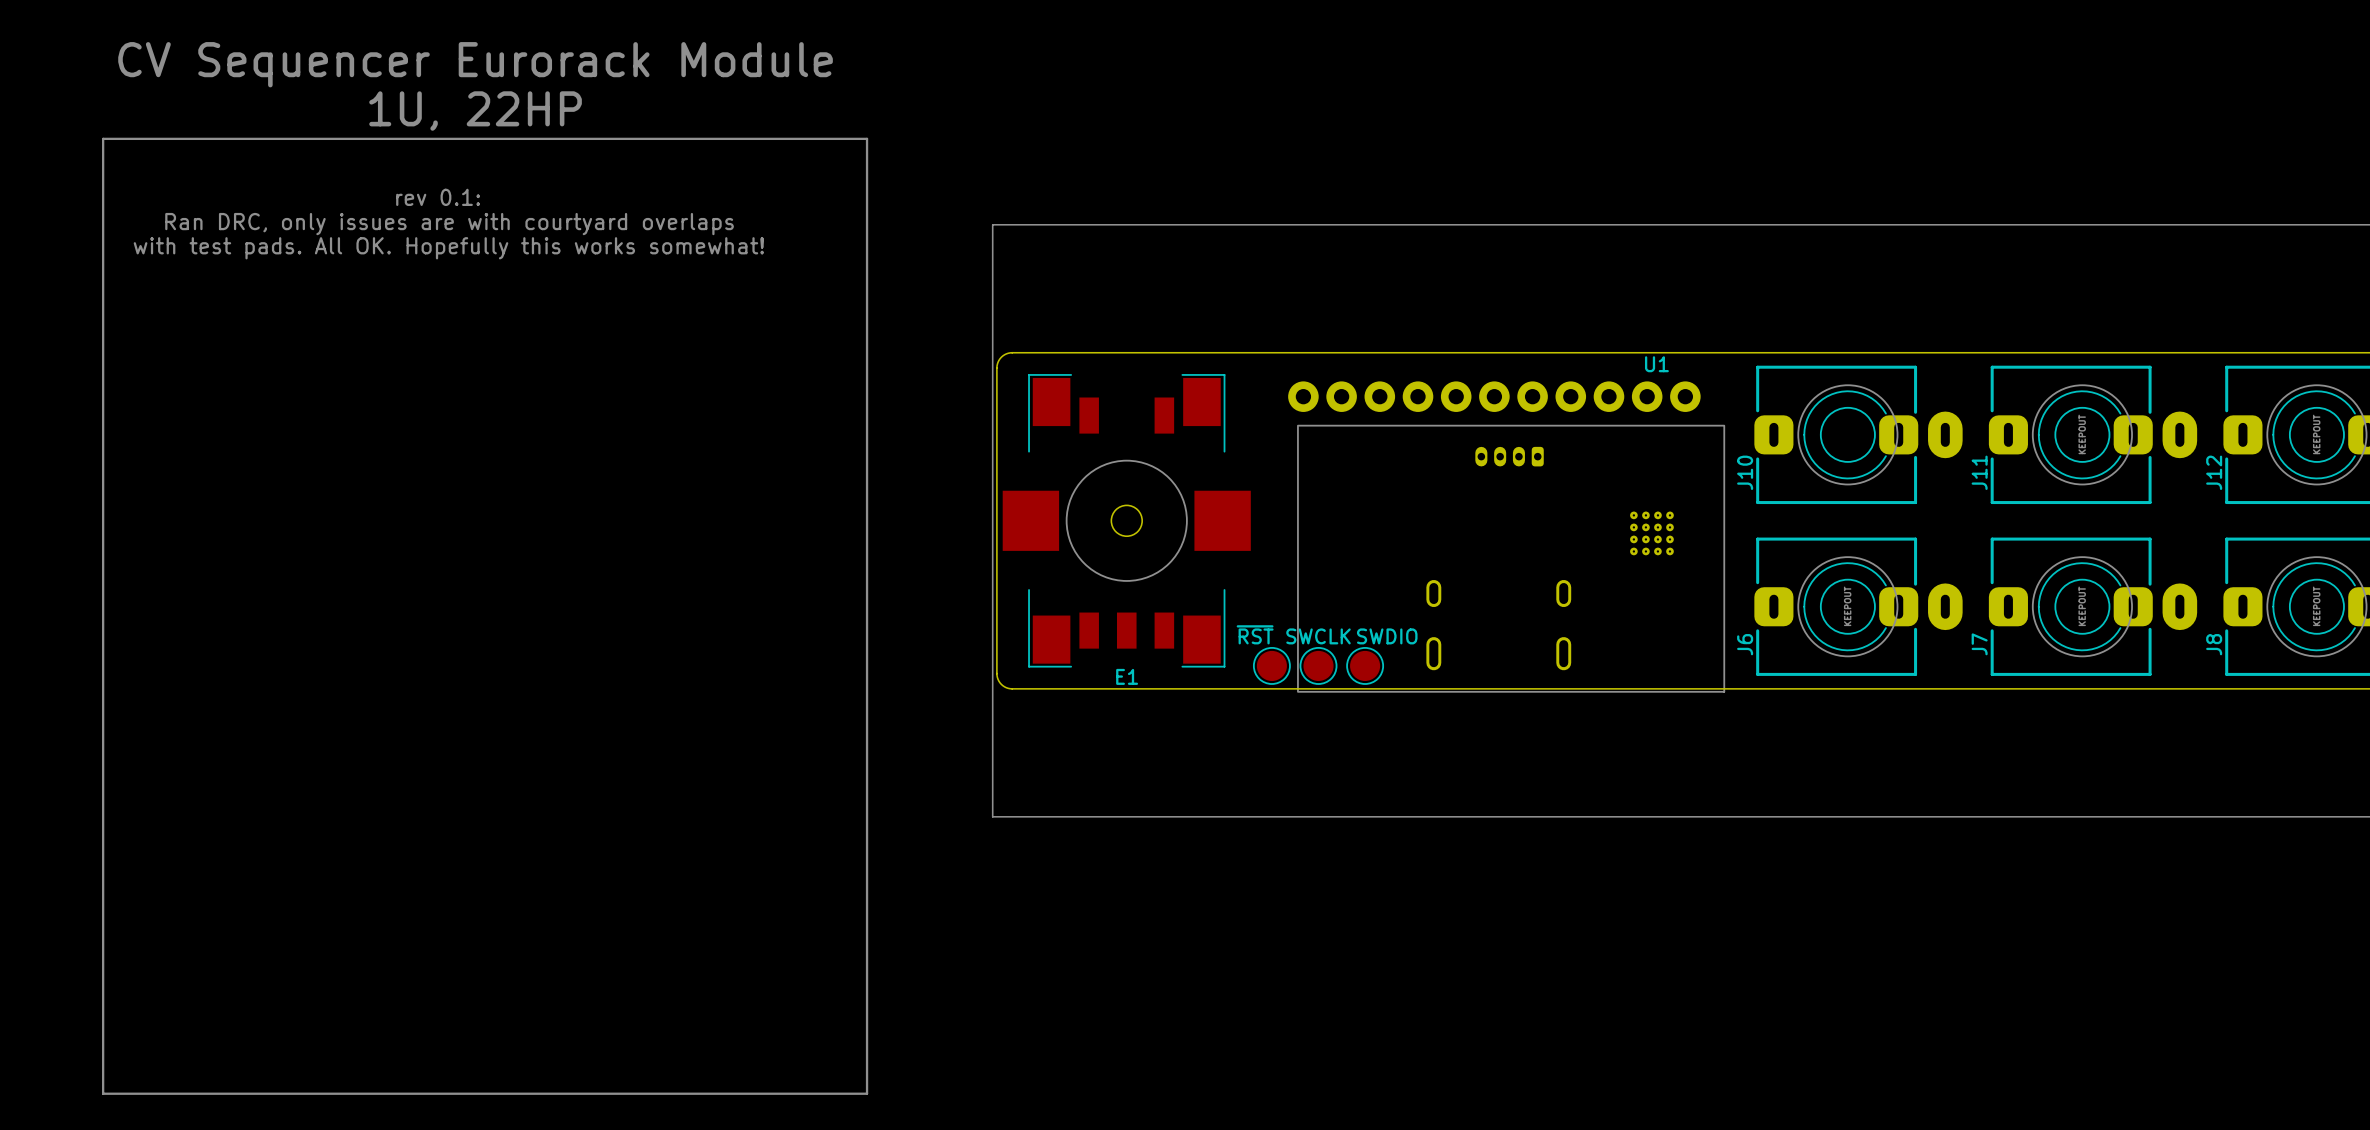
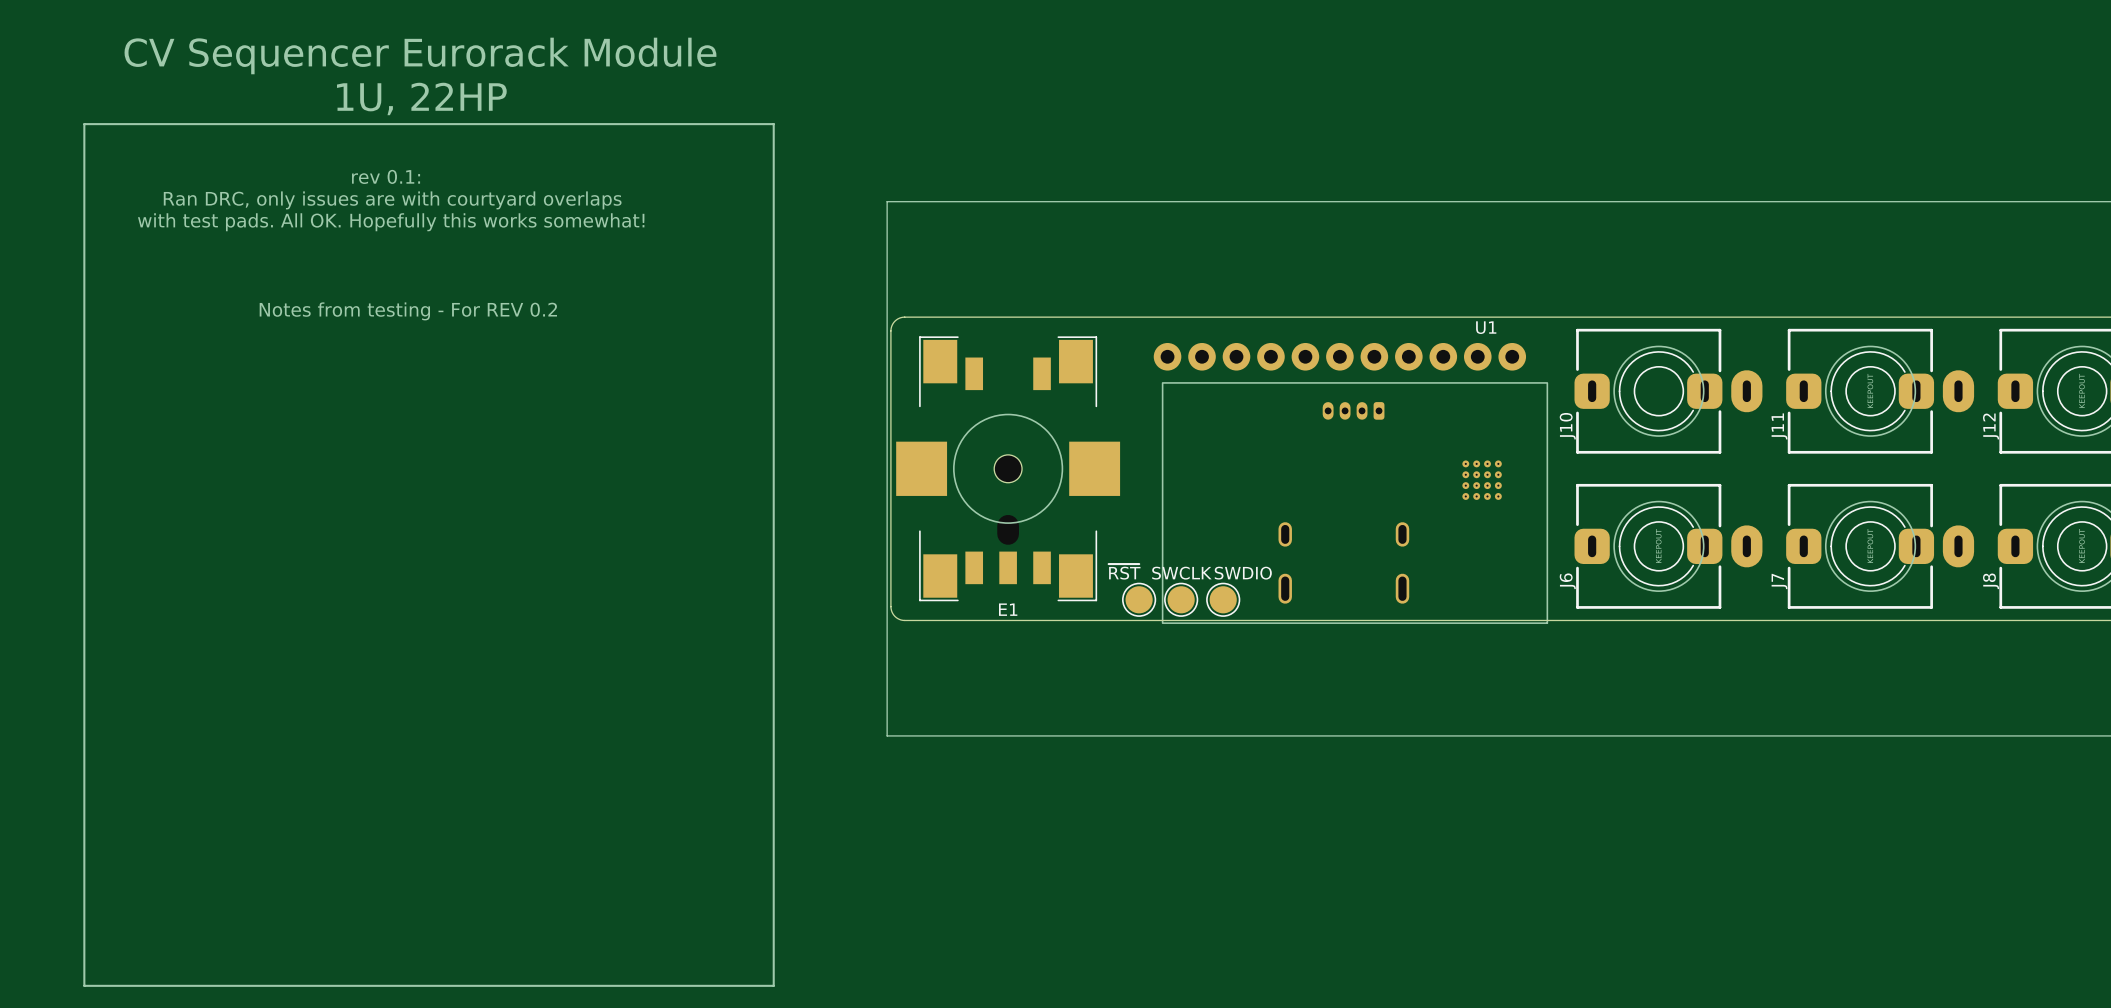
text: none -> Notes from testing - For REV 0.2 (408, 311)

